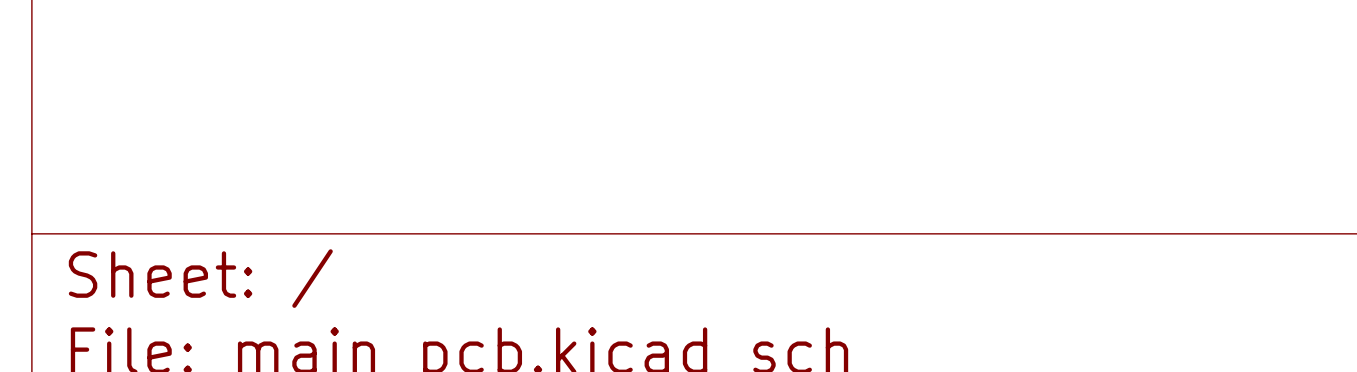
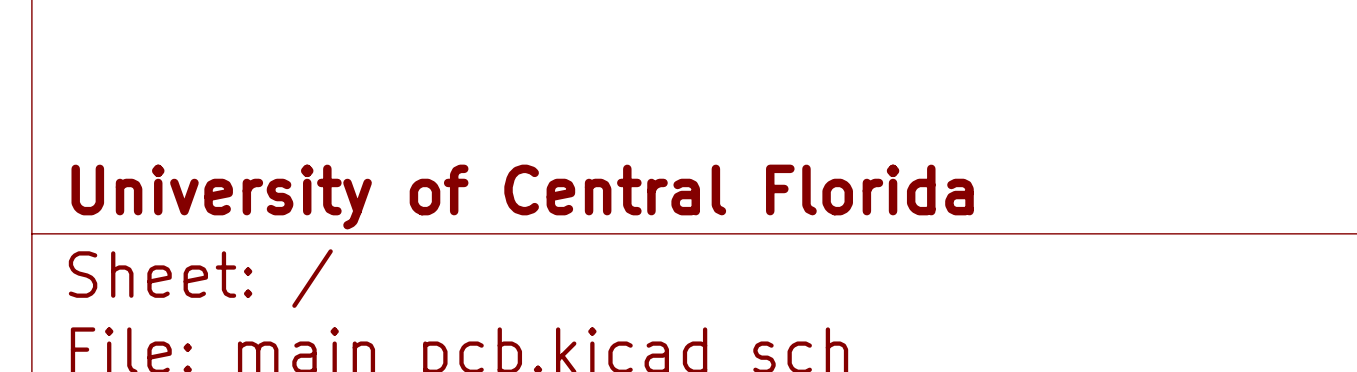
title block: none -> University of Central Florida (522, 197)

